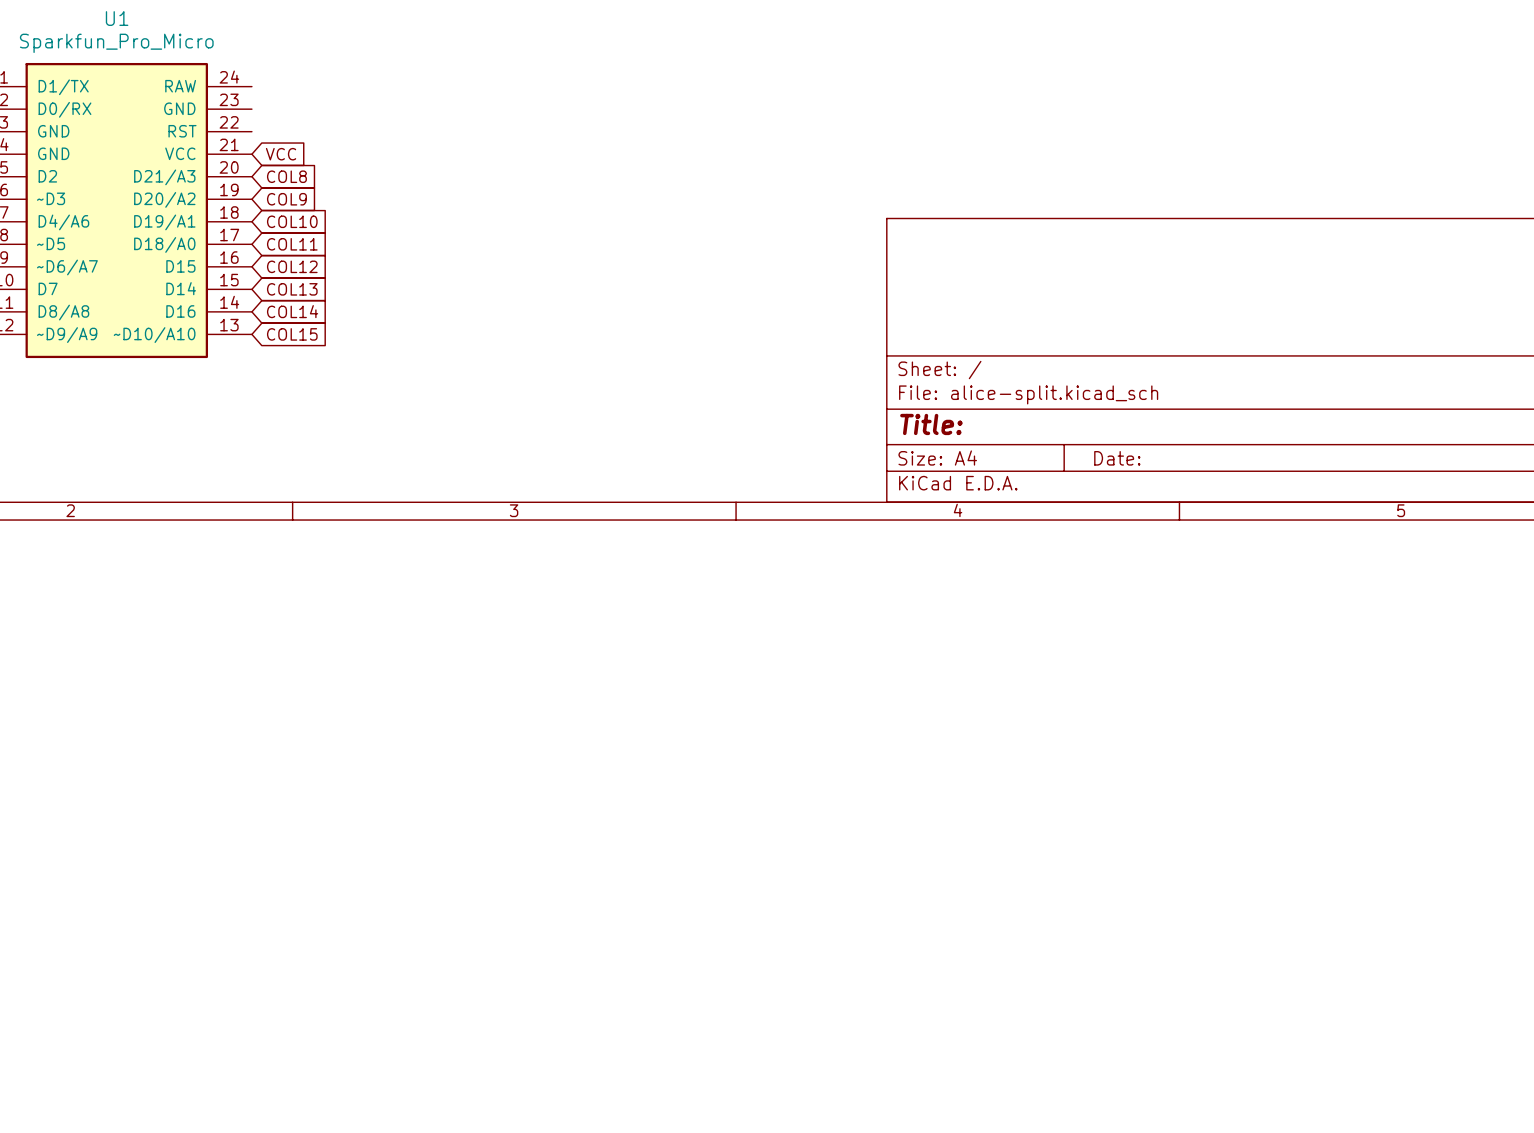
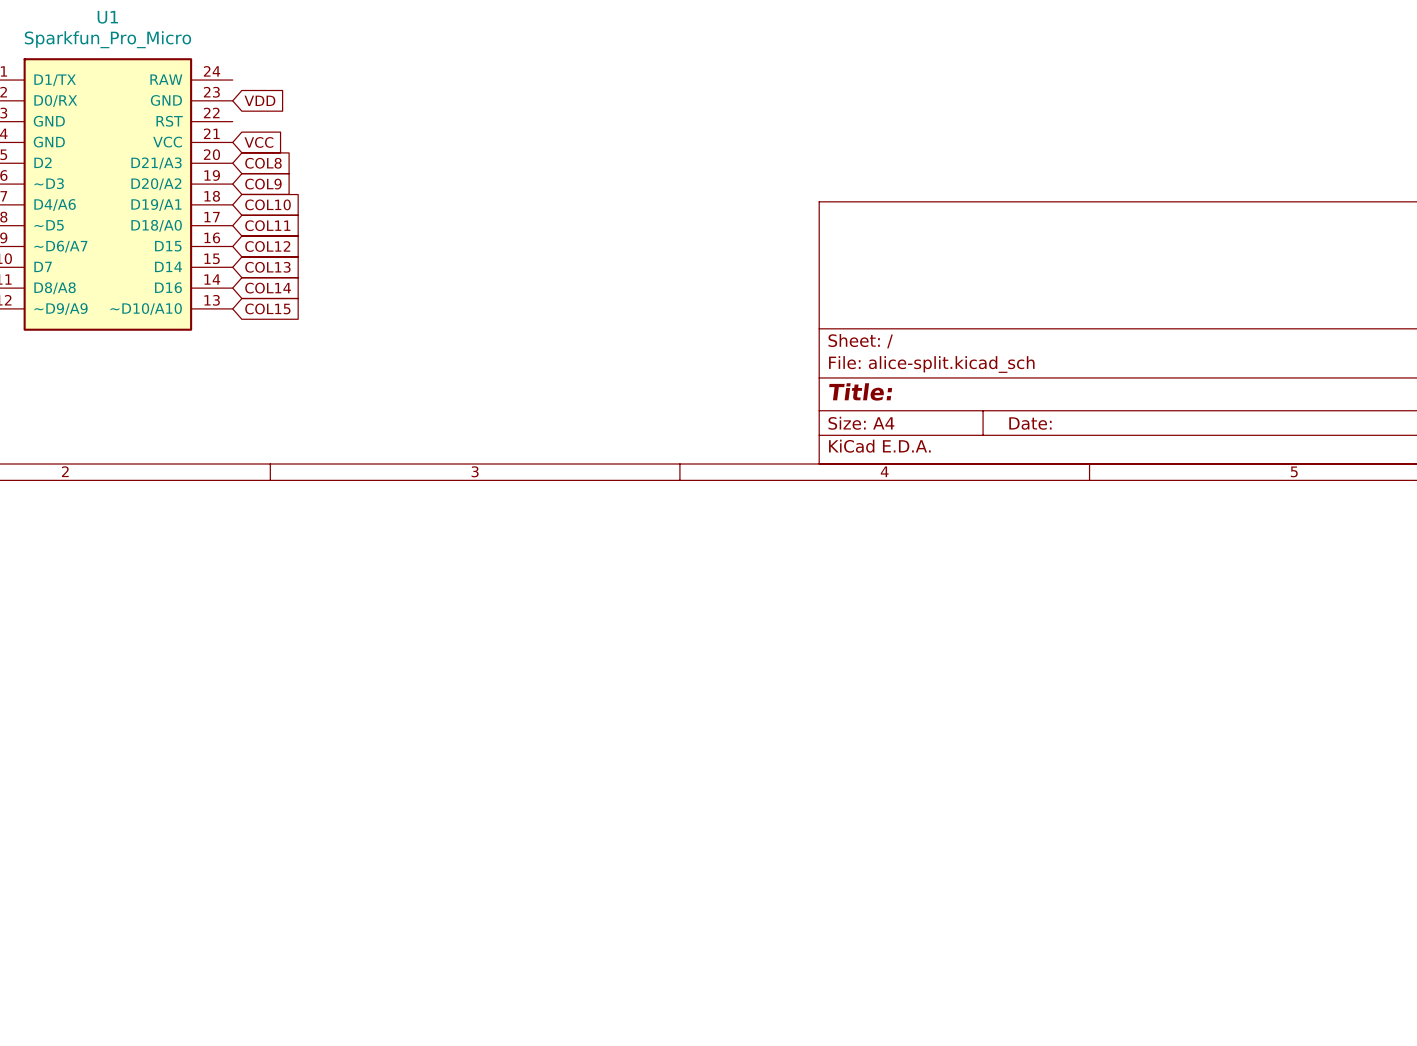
global label: none -> VDD (259, 100)

